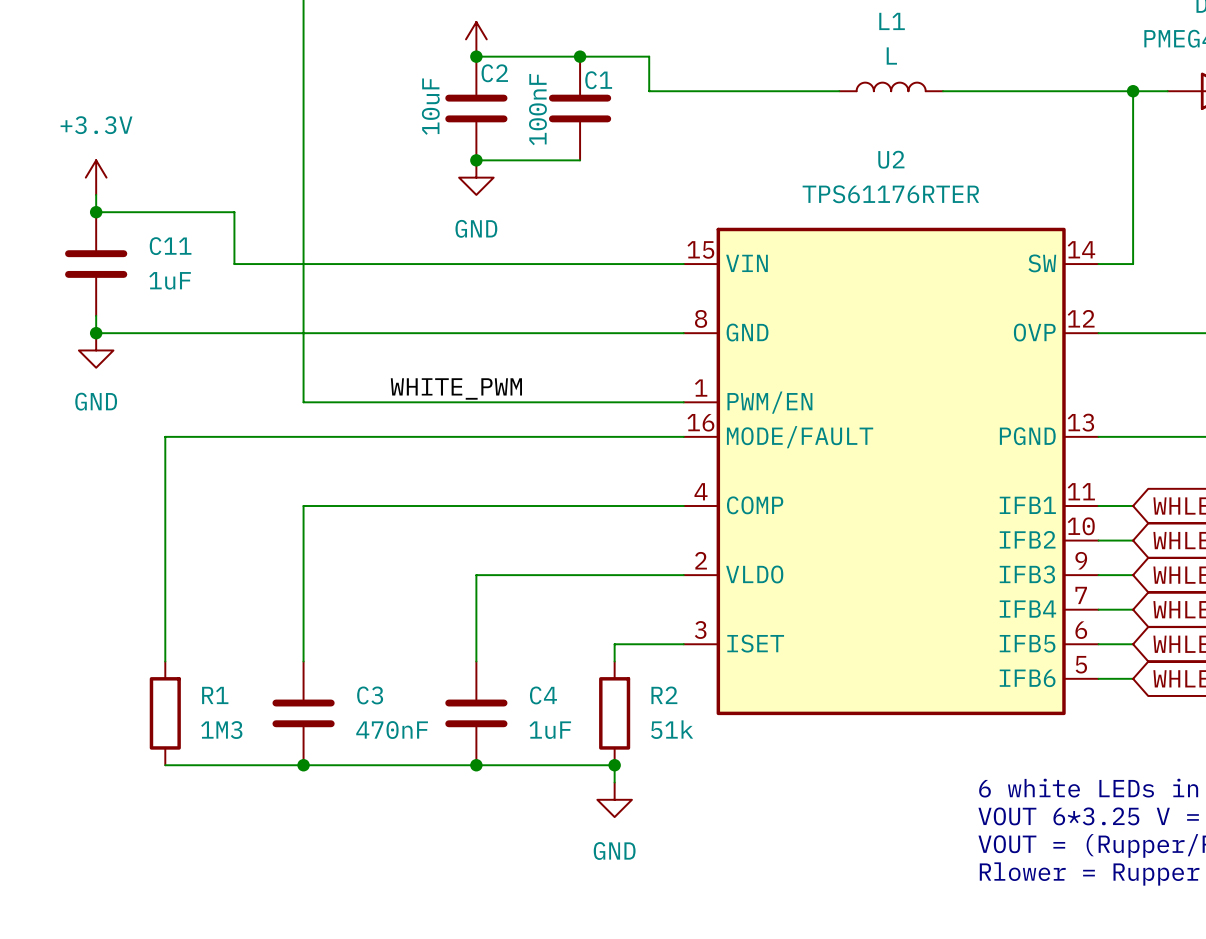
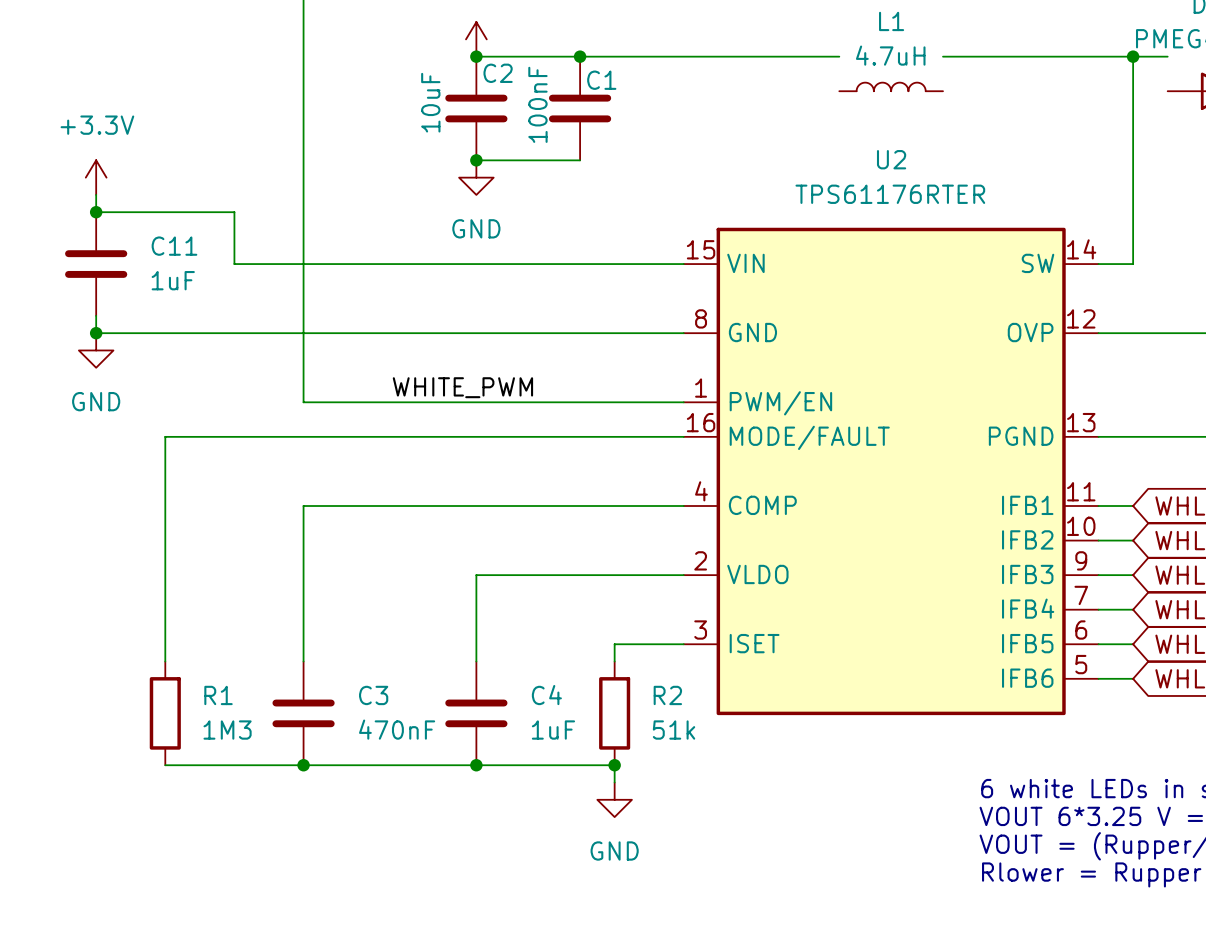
wire: (649, 56) (649, 91) (839, 91) -> (649, 56) (839, 56)
L1 value: L (891, 56) -> 4.7uH (890, 55)
wire: none -> (1133, 56) (1133, 91)
wire: (943, 91) (1167, 91) -> (943, 56) (1167, 56)
junction position: (1133, 91) -> (1133, 56)

